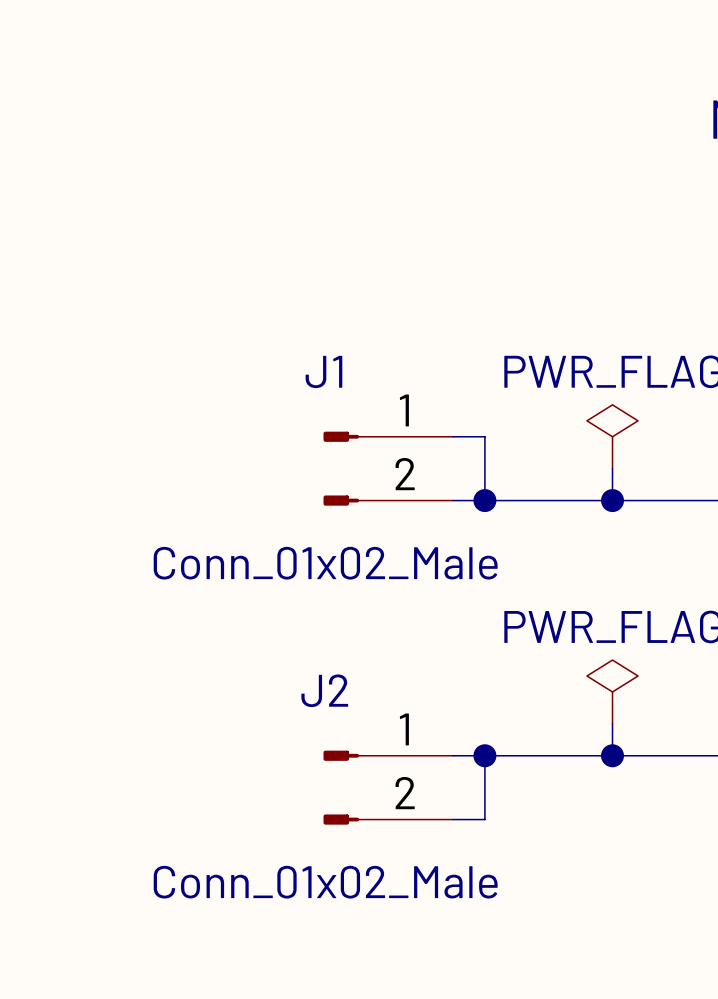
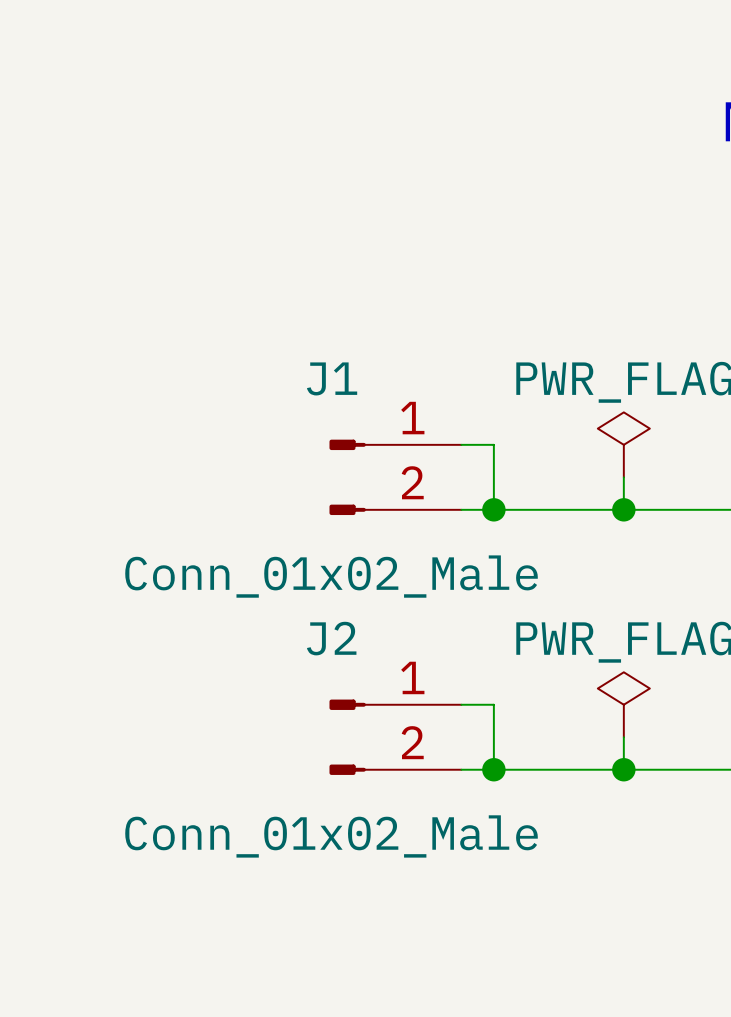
wire: (484, 755) (484, 819) (453, 819) -> (493, 769) (493, 704) (461, 704)
J2 position: (388, 787) -> (395, 737)

